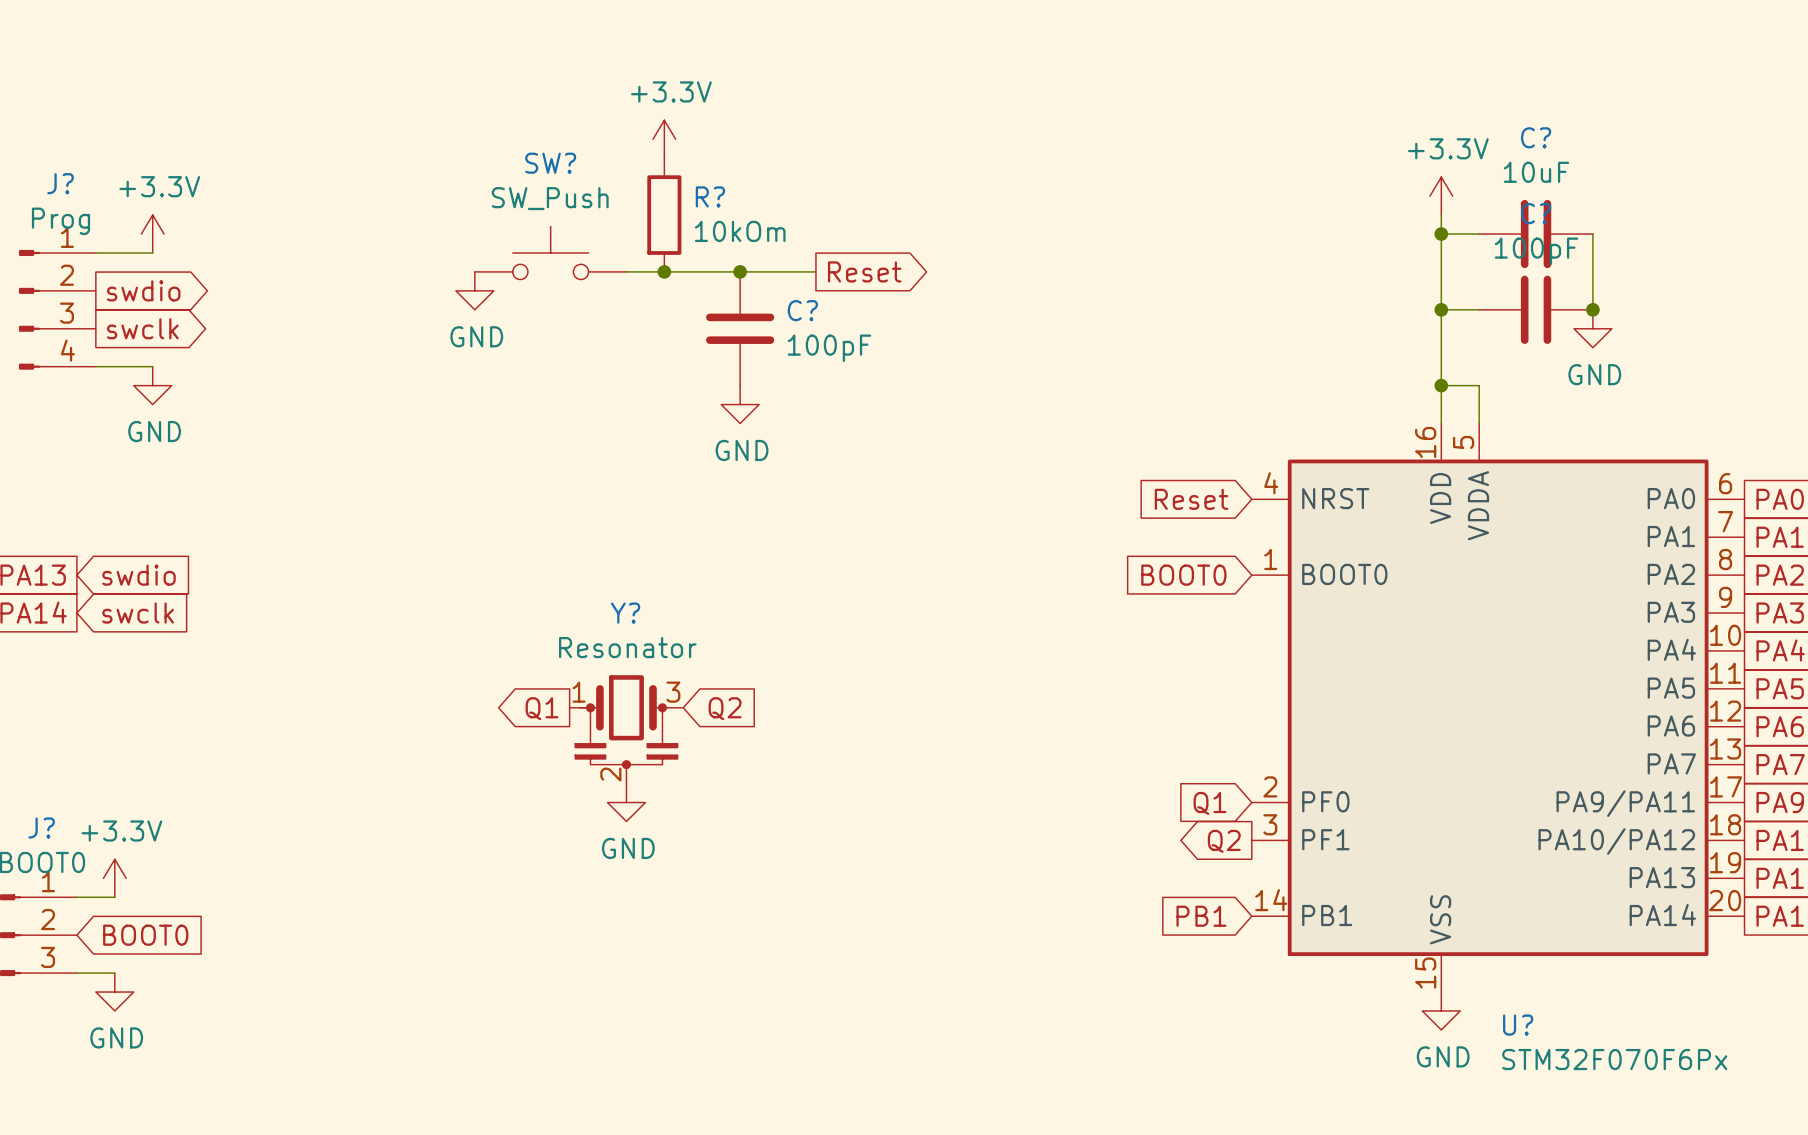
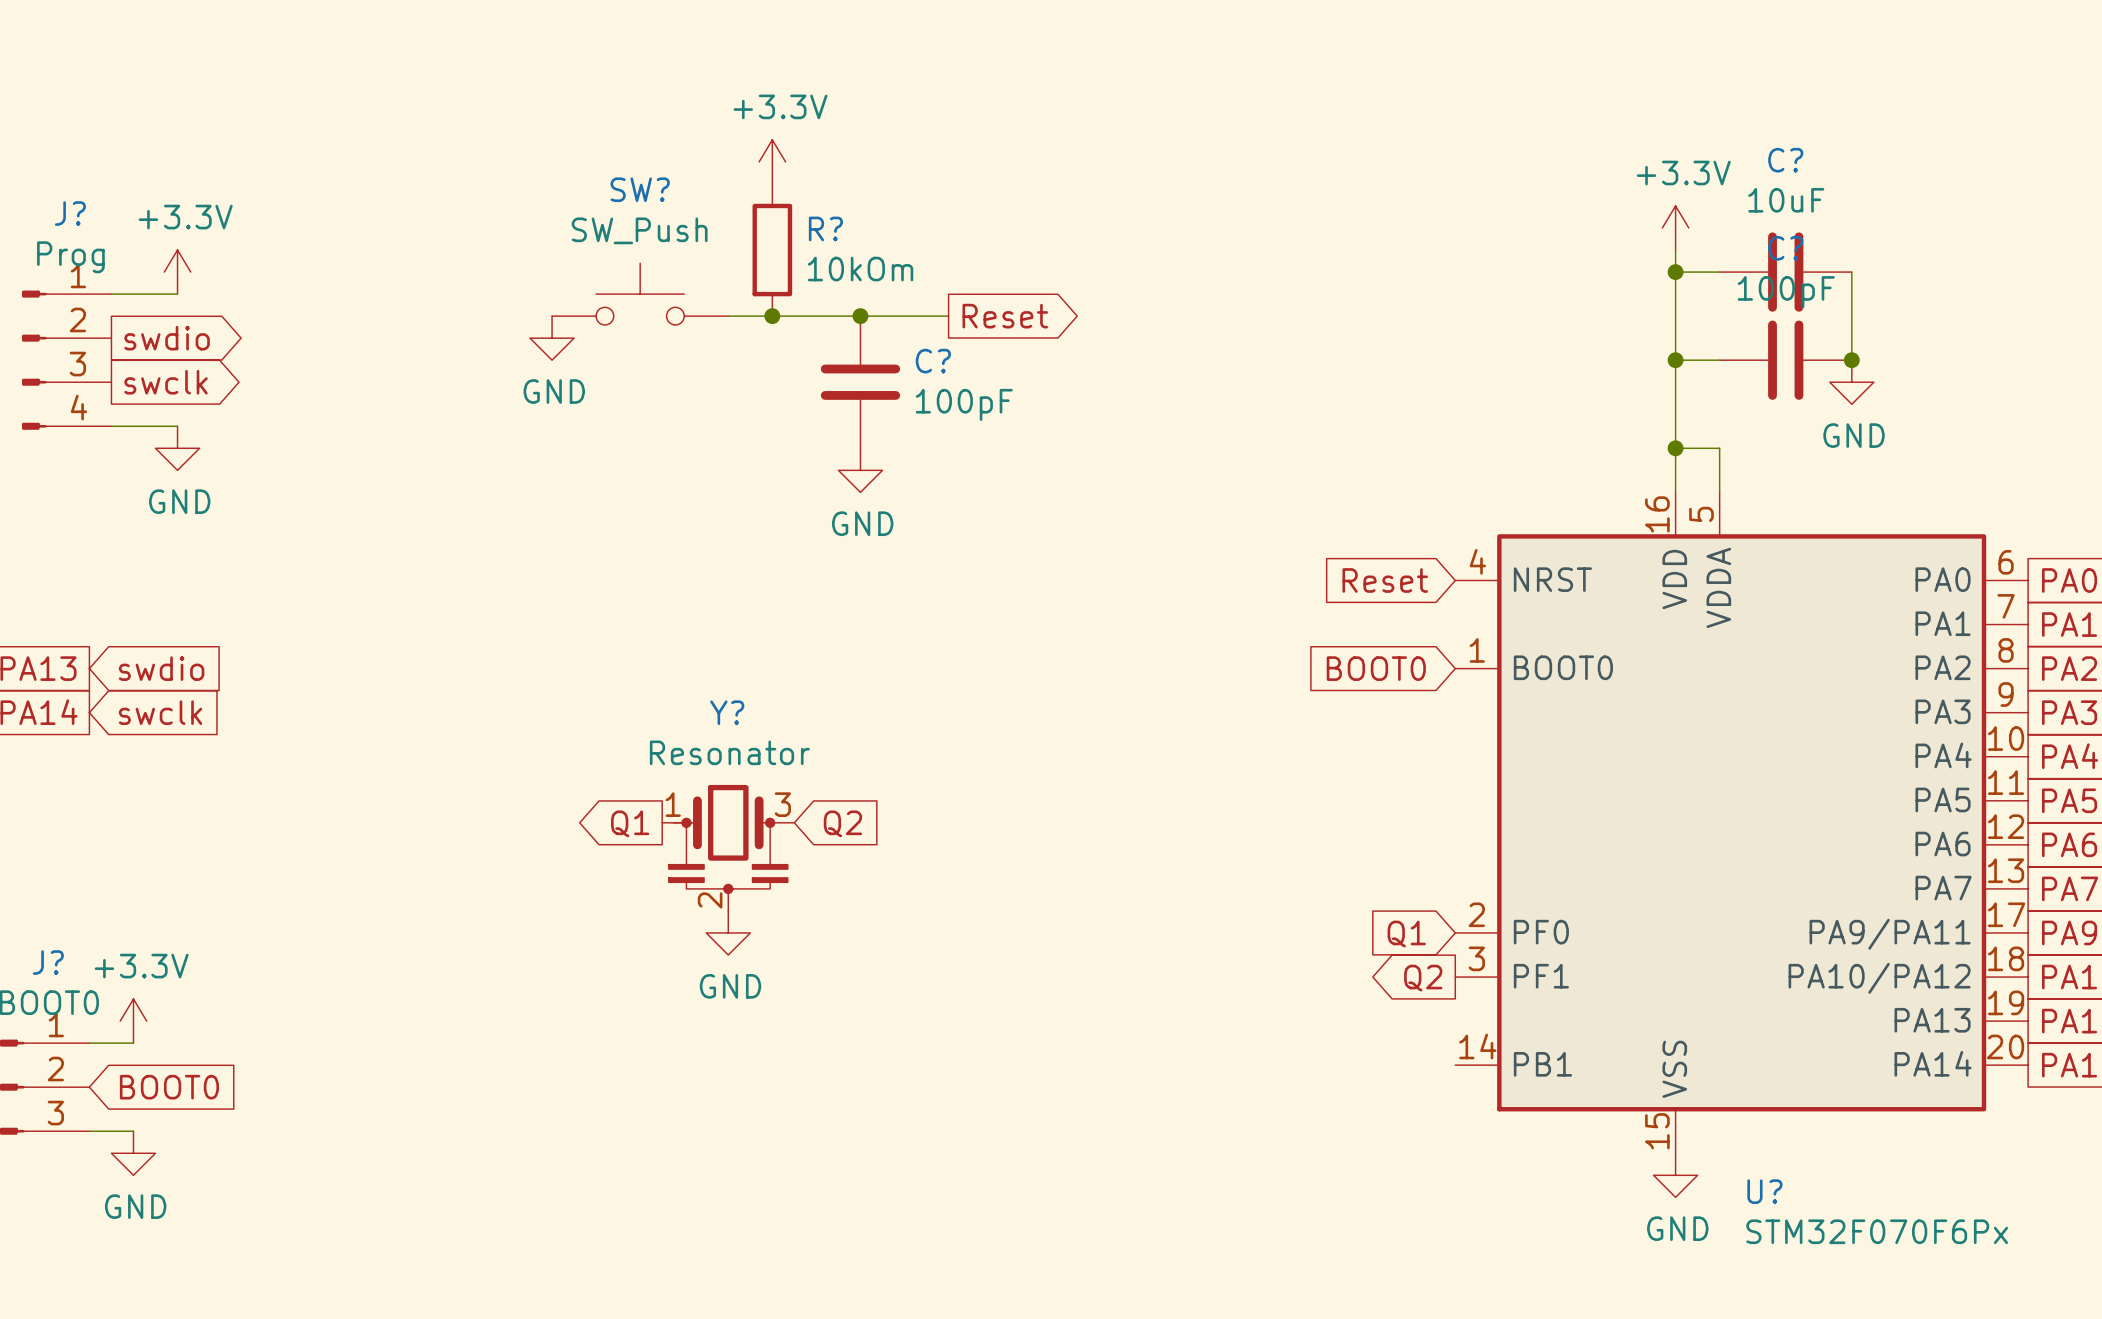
global label: PB1 (1201, 916) -> none

